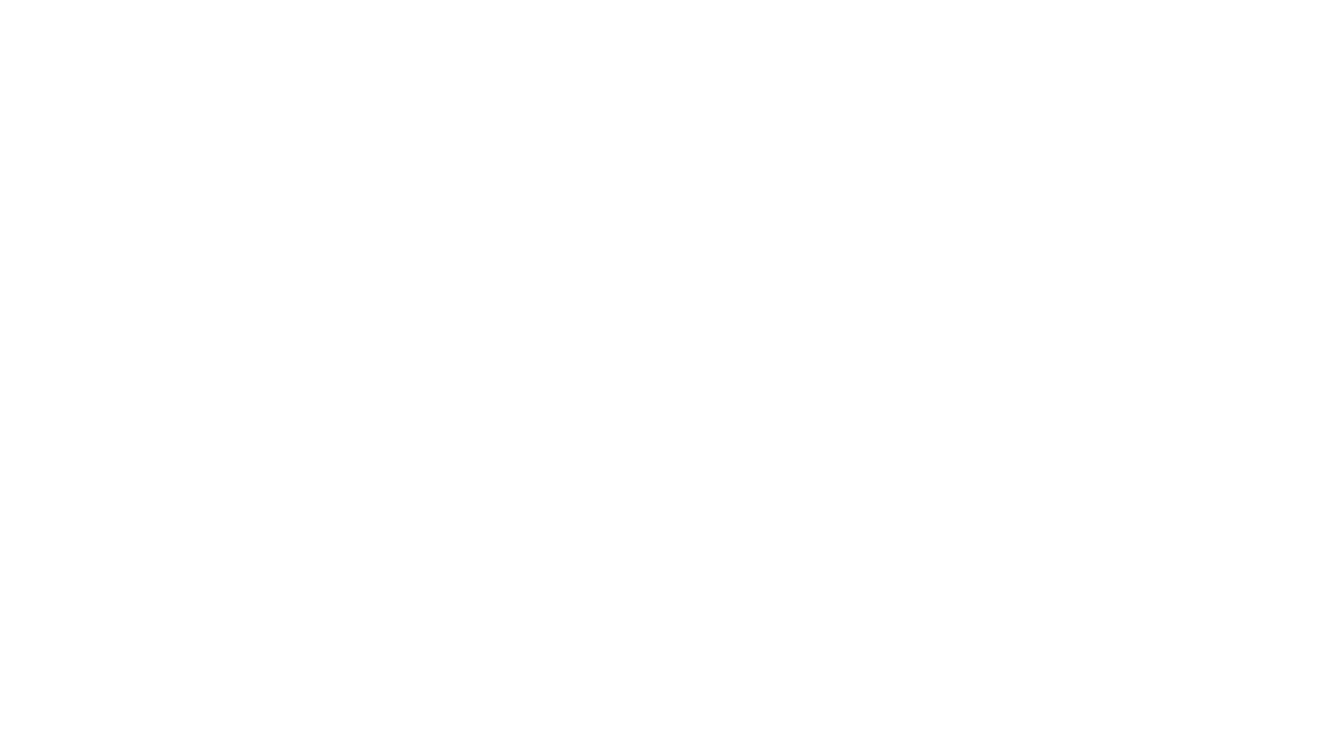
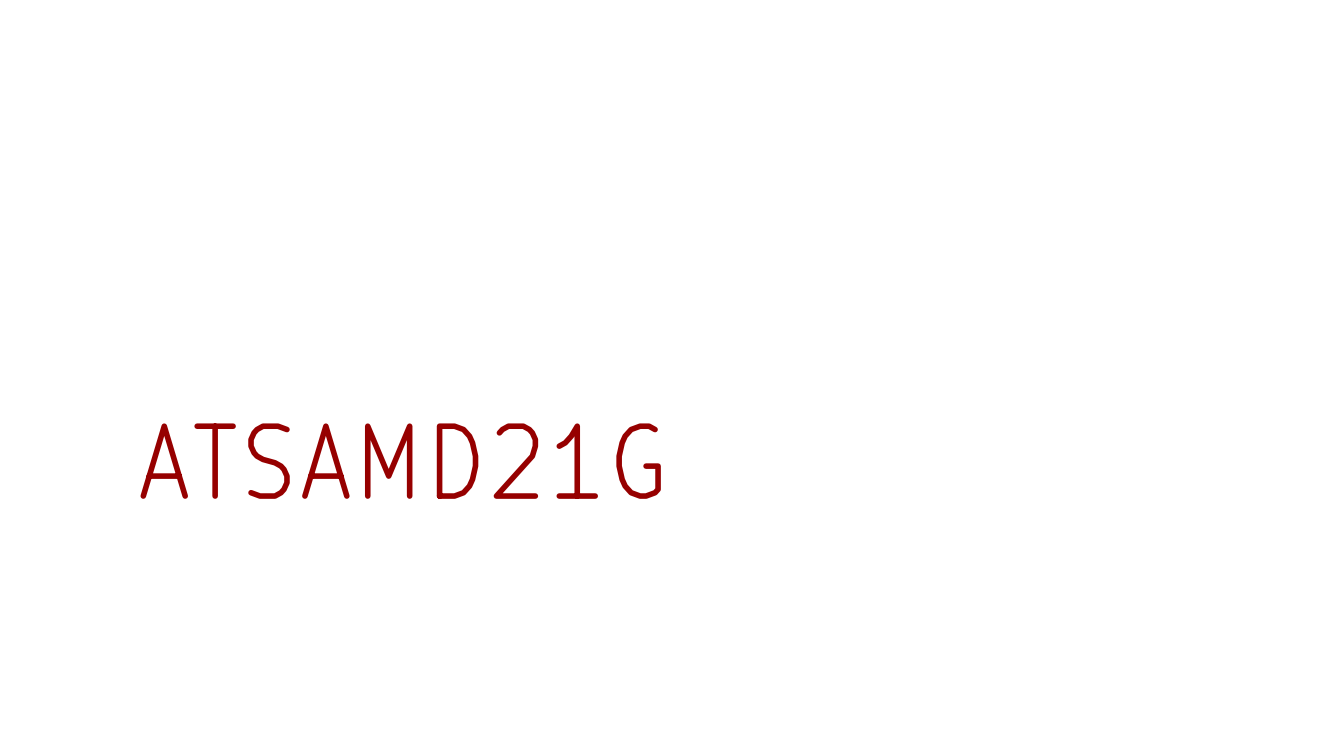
text: none -> ATSAMD21G (400, 461)

